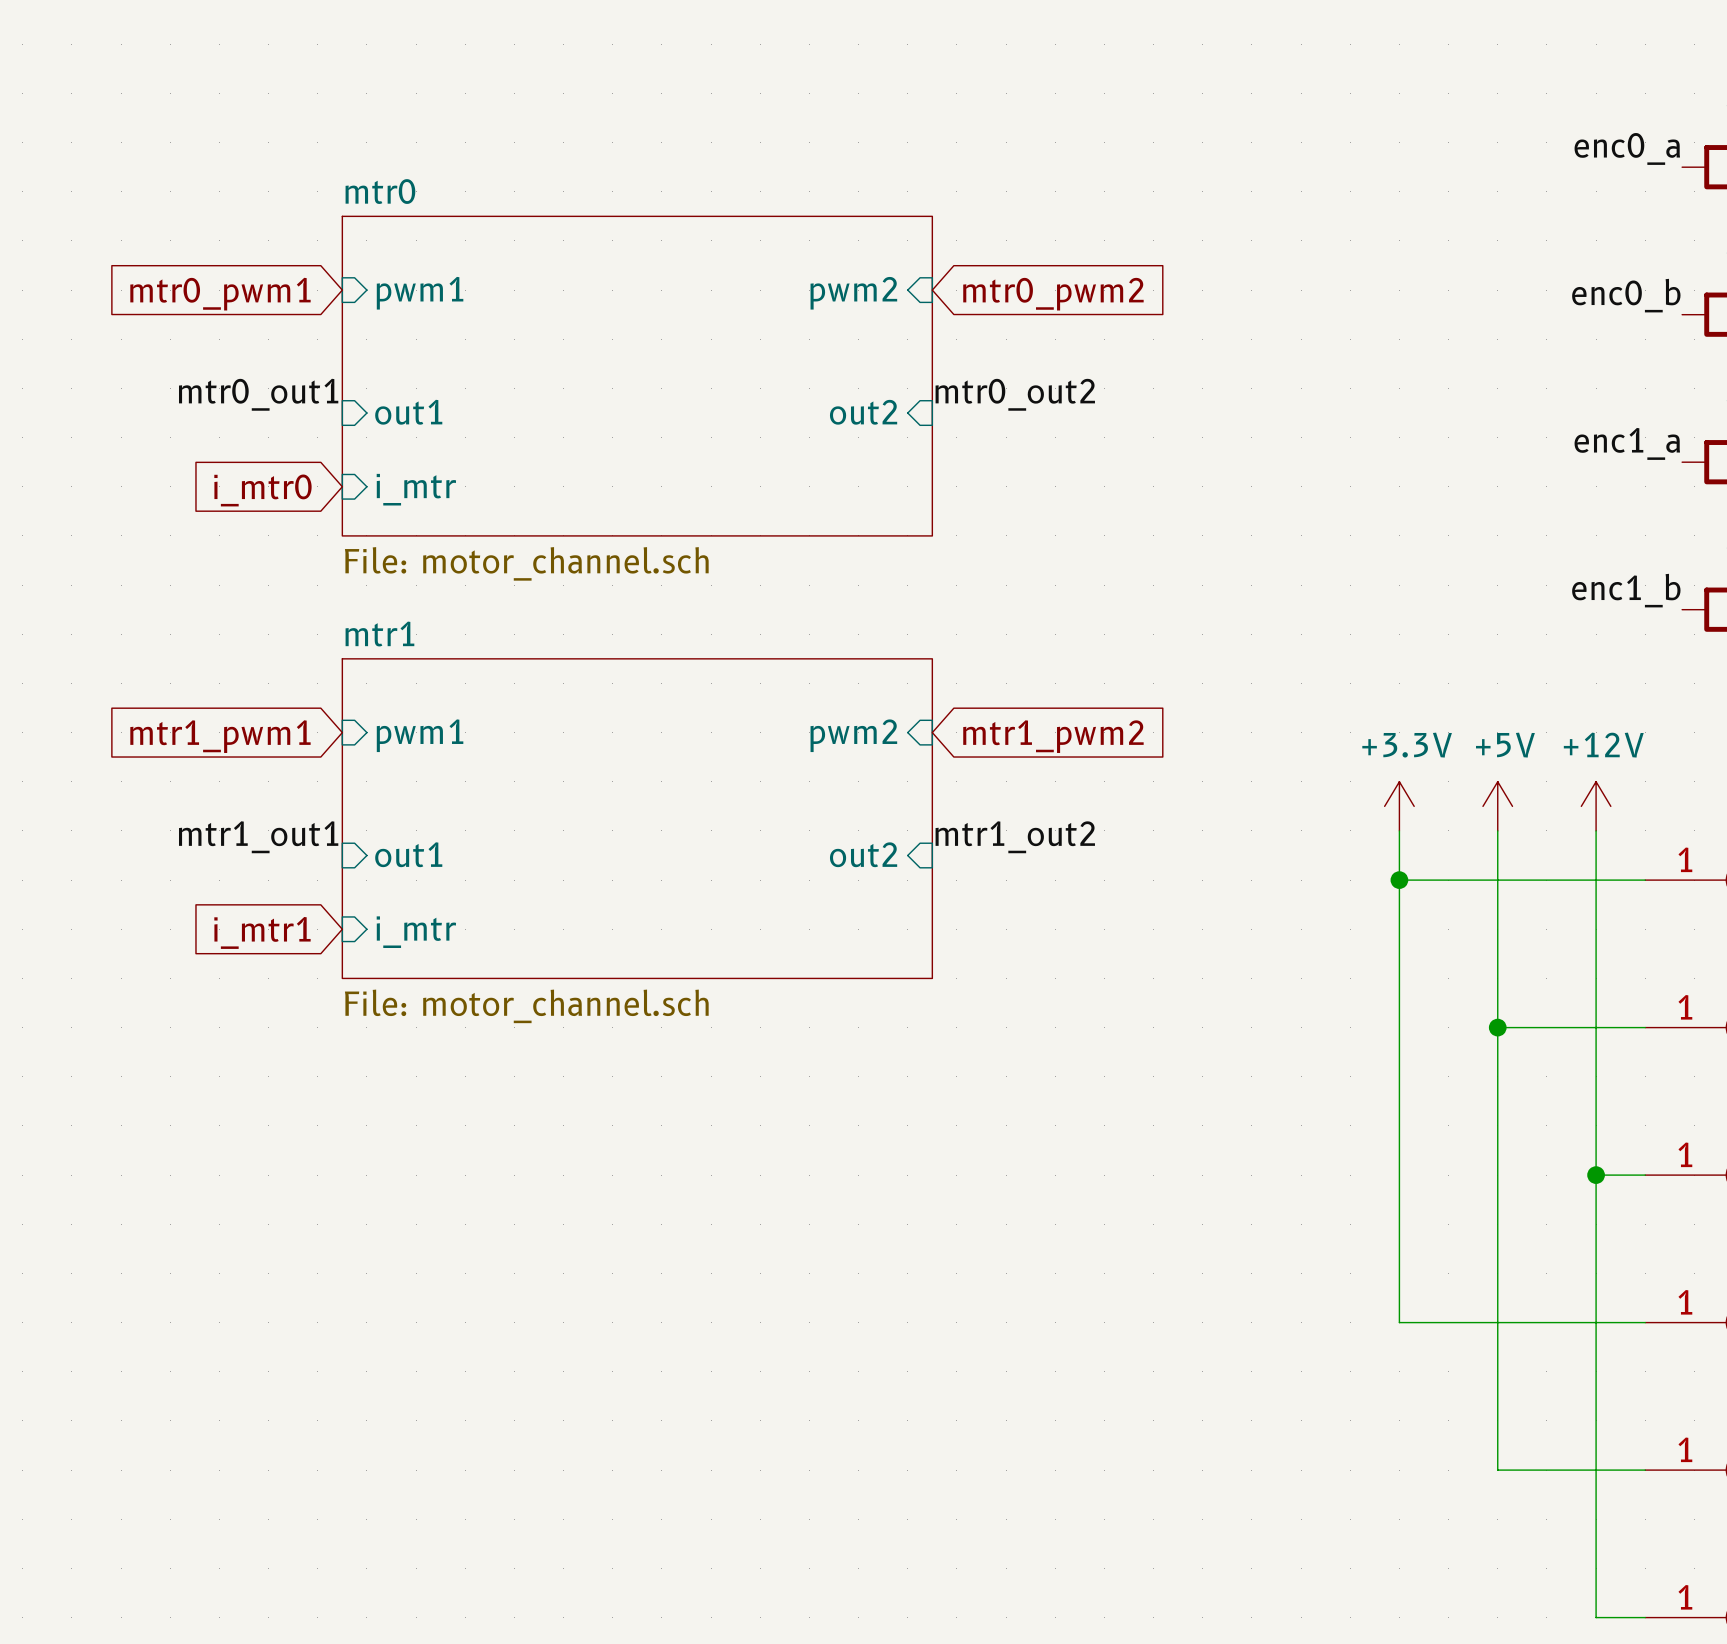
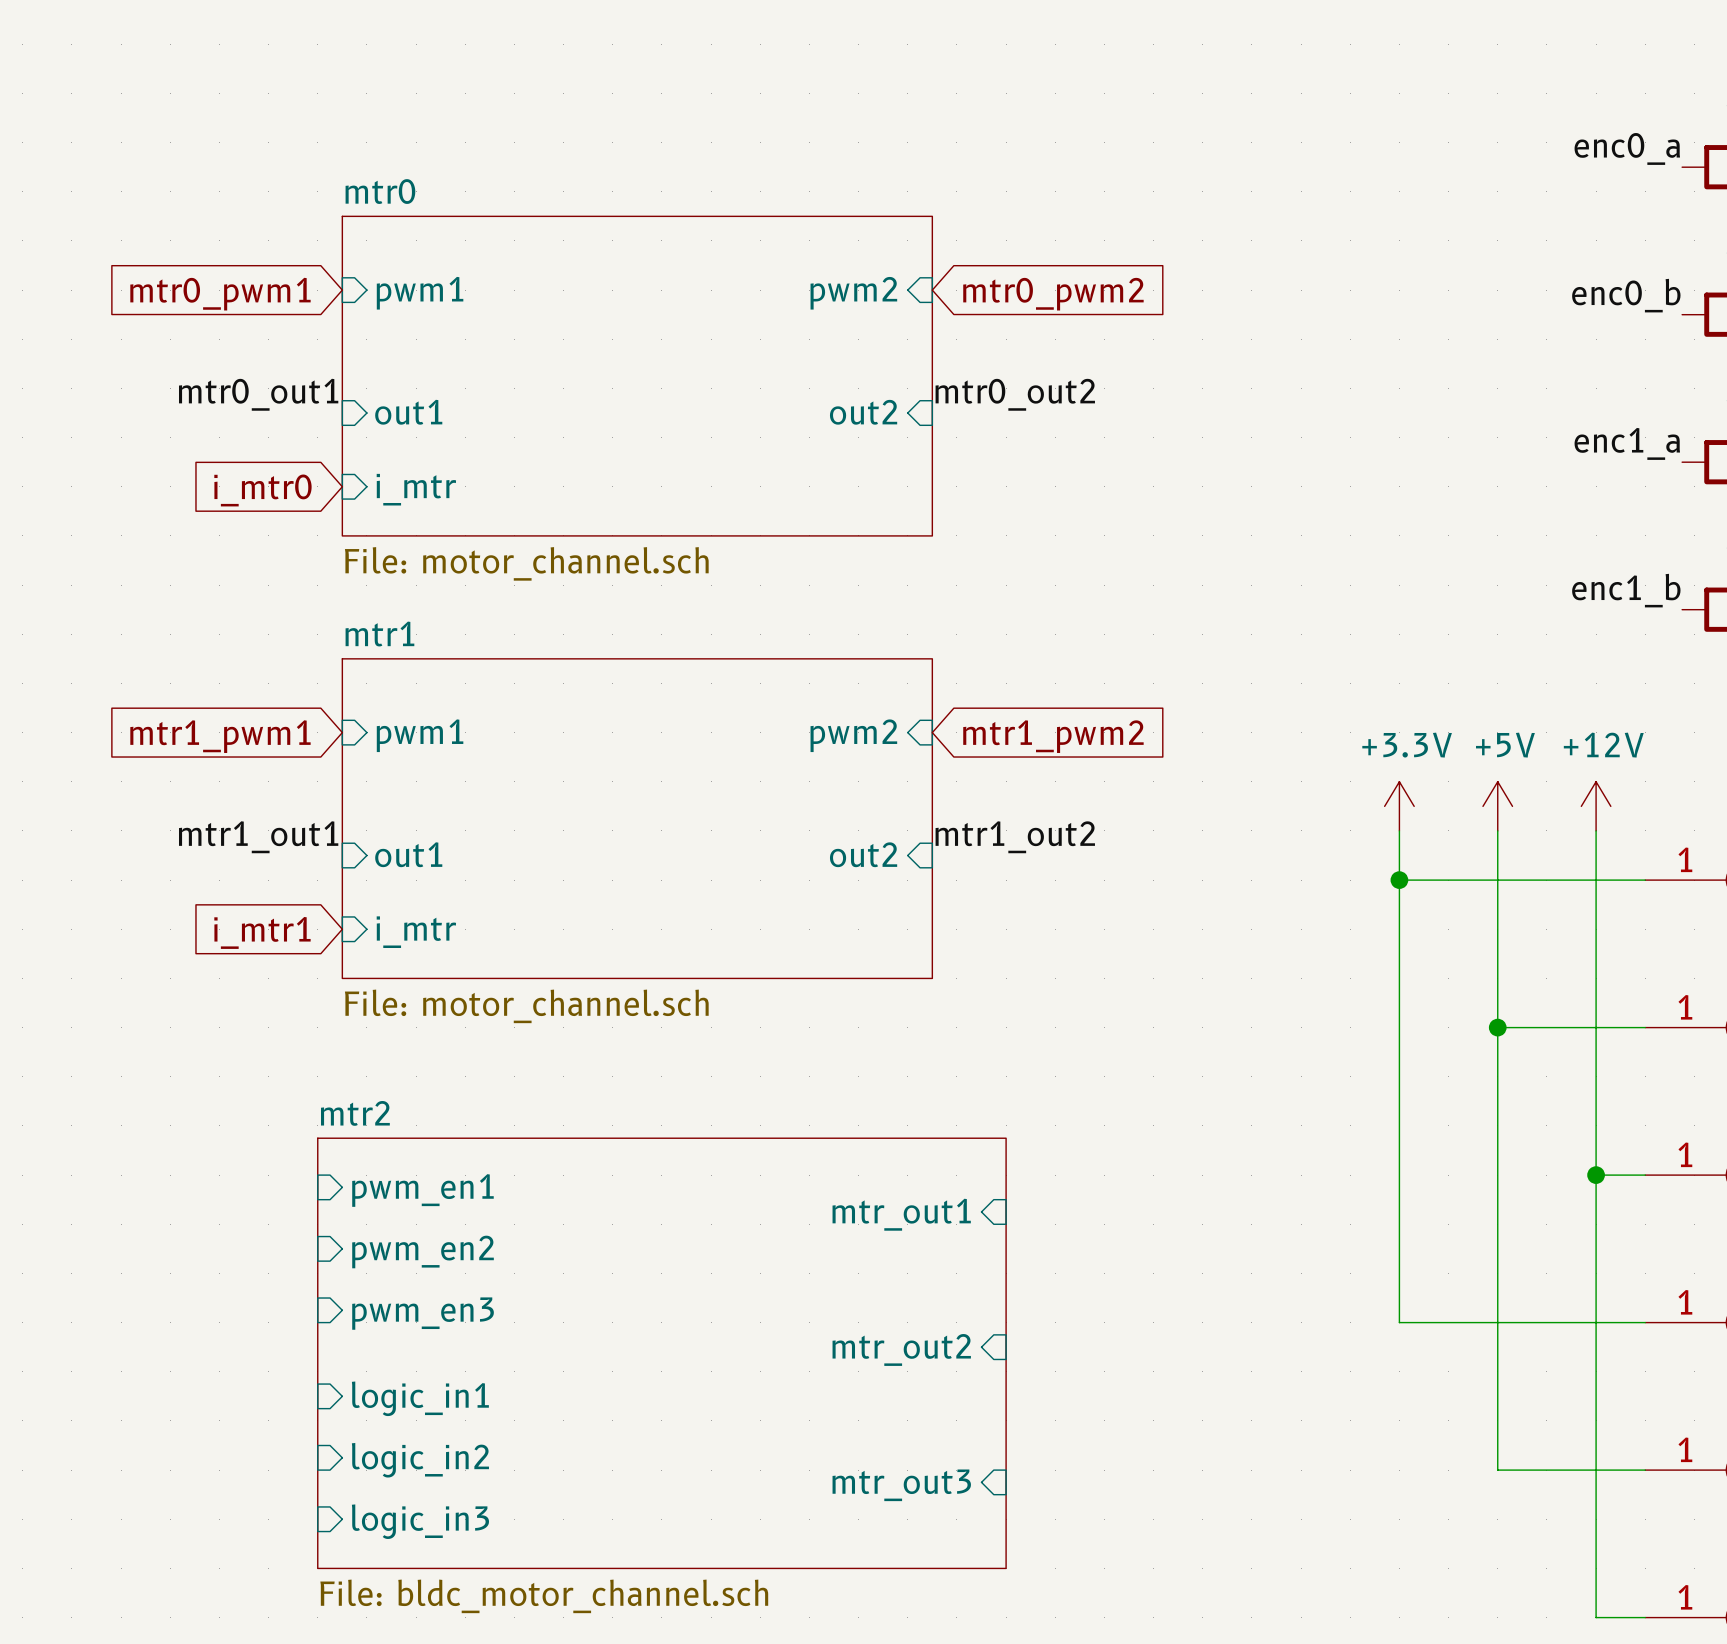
sheet pin: none -> pwm_en1 (422, 1190)
sheet pin: none -> mtr_out1 (901, 1214)
sheet pin: none -> pwm_en2 (423, 1251)
sheet pin: none -> pwm_en3 (423, 1313)
sheet pin: none -> mtr_out2 (901, 1349)
sheet mtr2: none -> File: bldc_motor_channel.sch (661, 1353)
sheet pin: none -> logic_in1 (420, 1398)
sheet pin: none -> logic_in2 (420, 1460)
sheet pin: none -> mtr_out3 (901, 1485)
sheet pin: none -> logic_in3 (420, 1521)

